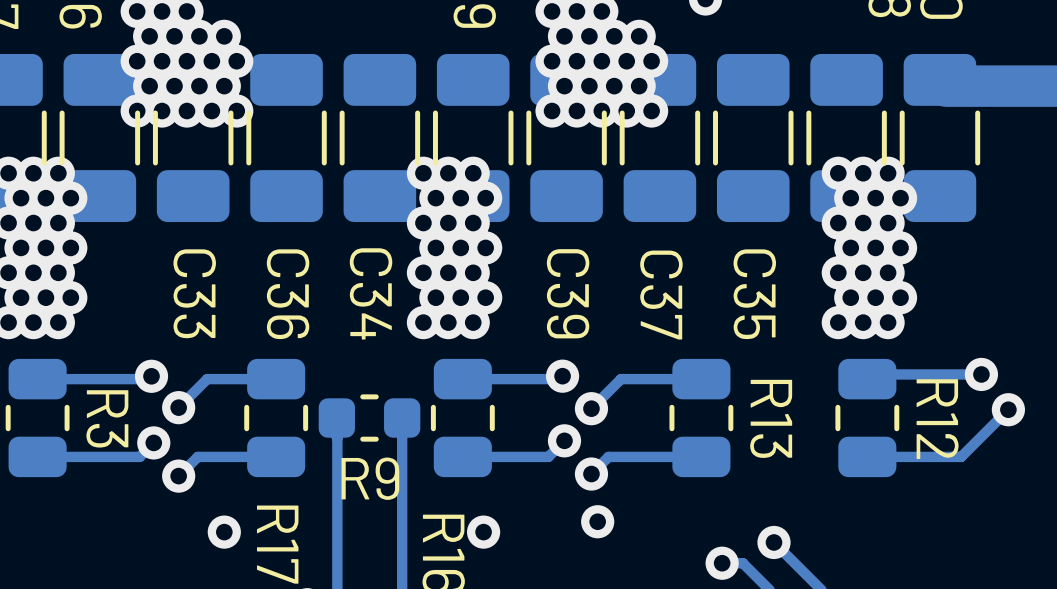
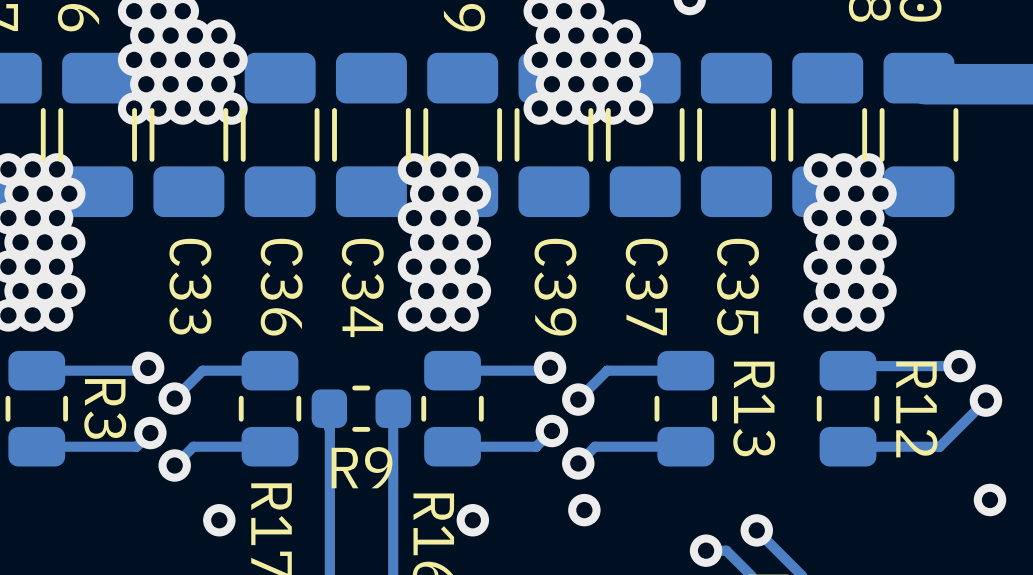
via: none -> (990, 499)

